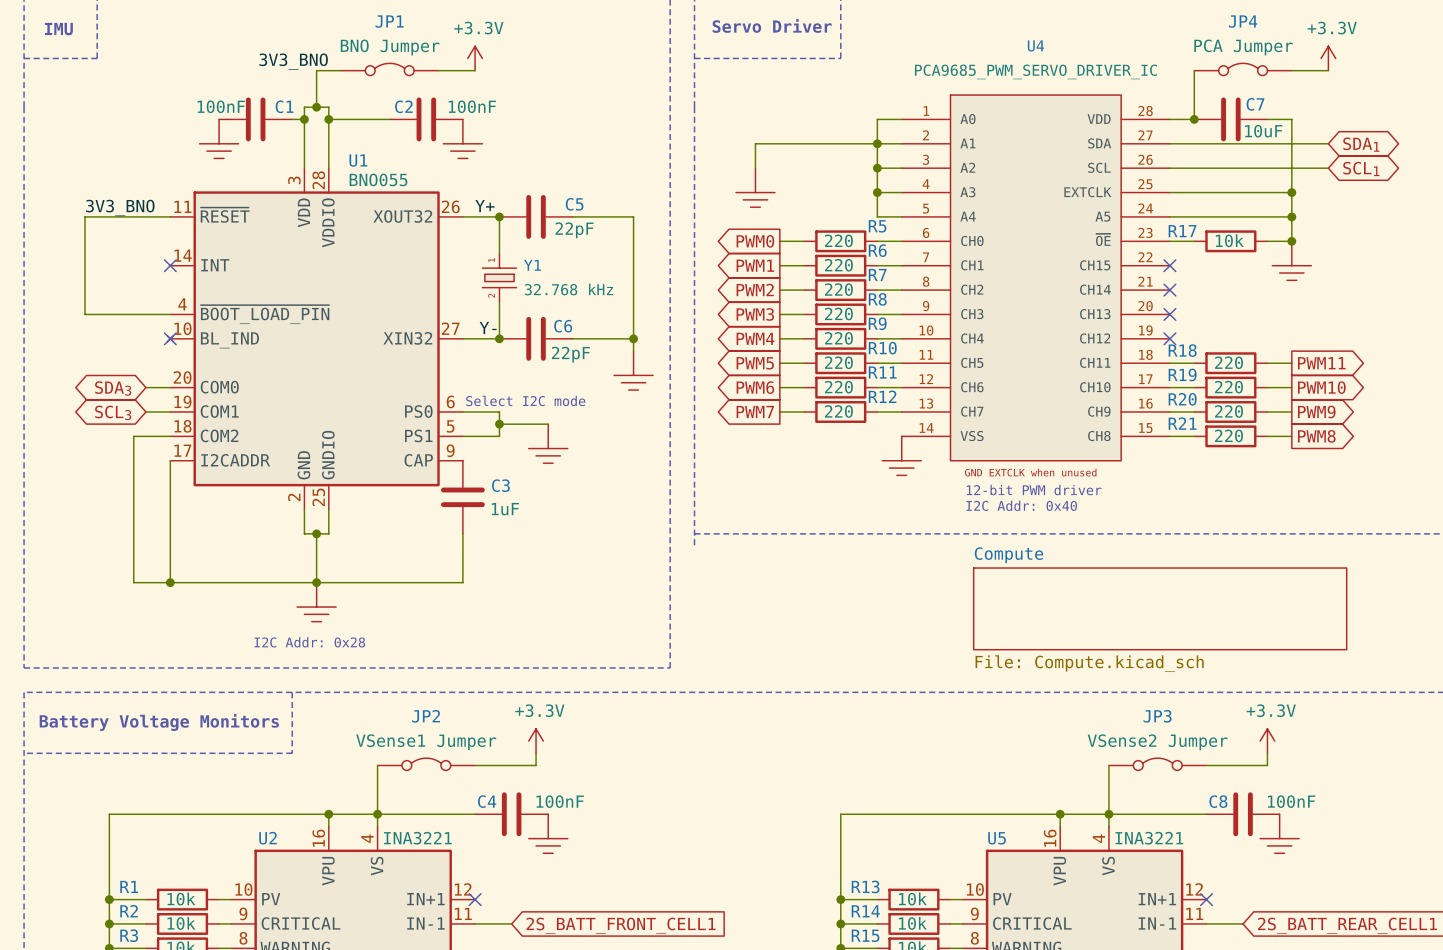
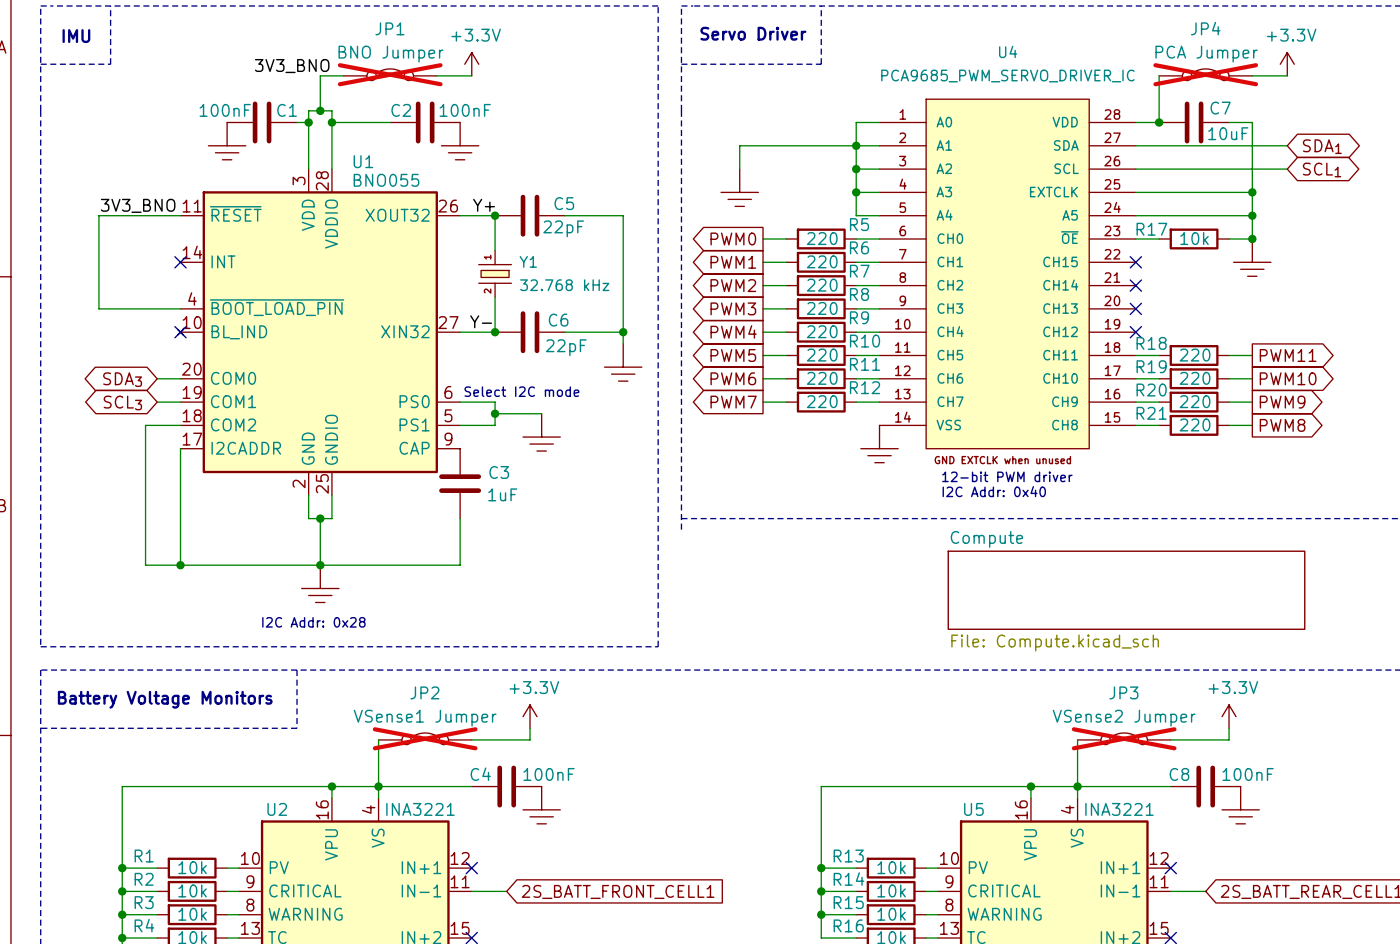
JP1 do-not-place cross: none -> (390, 74)
JP4 do-not-place cross: none -> (1205, 74)
JP2 do-not-place cross: none -> (425, 738)
JP3 do-not-place cross: none -> (1124, 738)

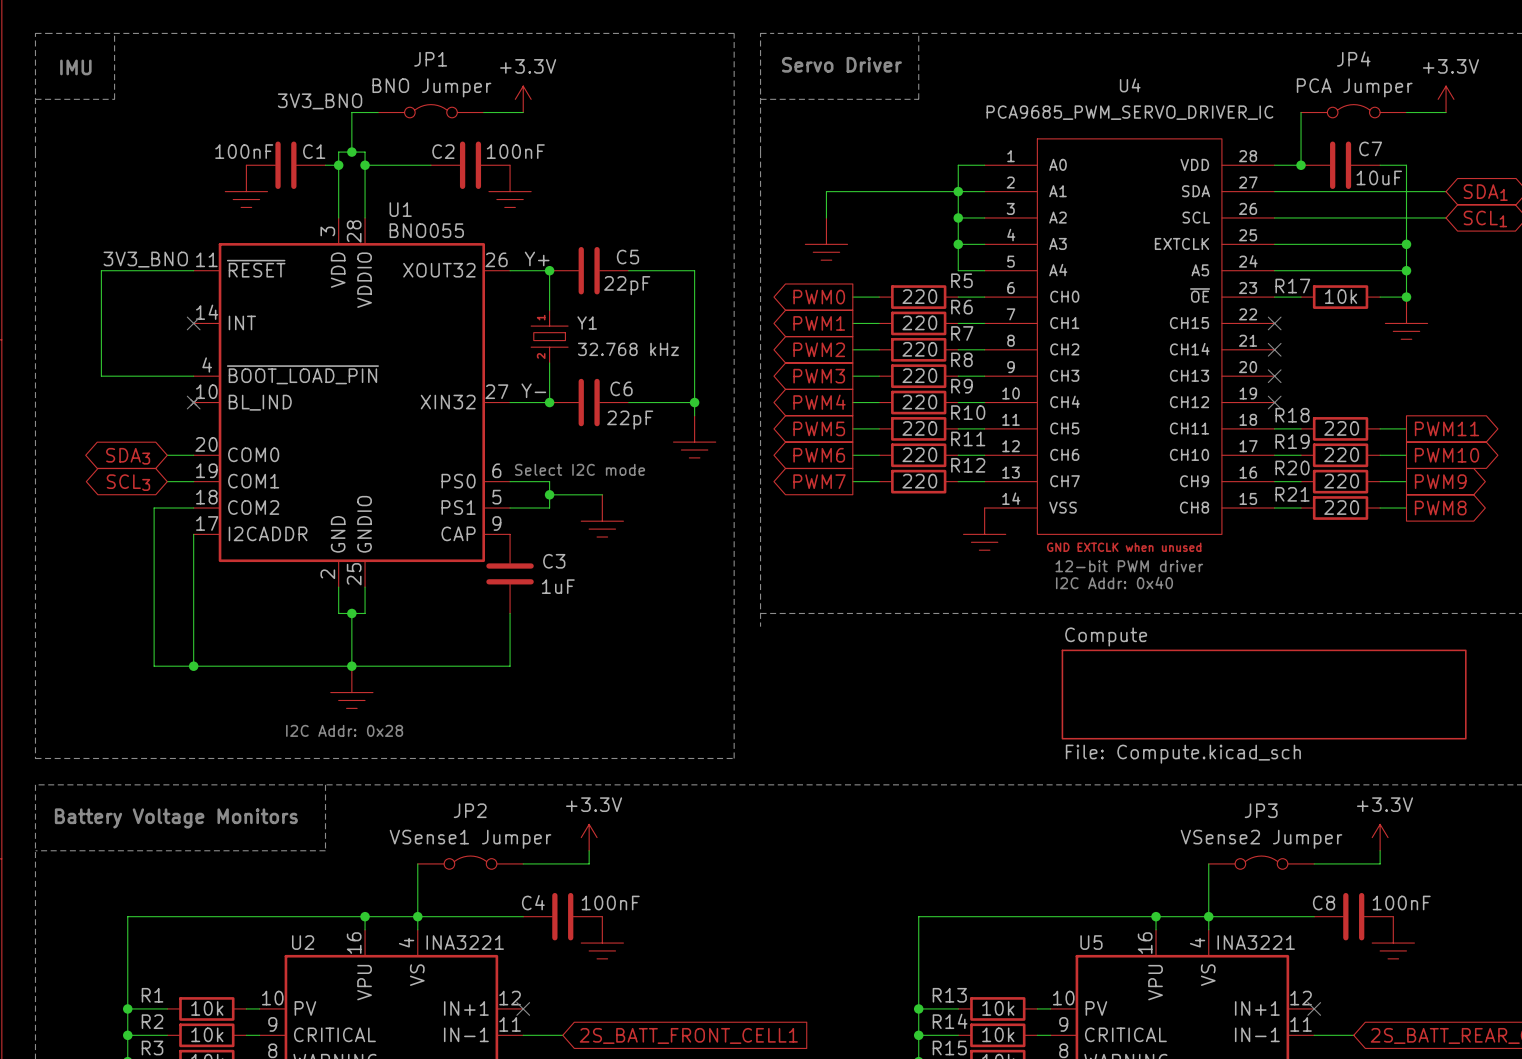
JP1 do-not-place cross: (390, 74) -> none
JP4 do-not-place cross: (1205, 74) -> none
JP2 do-not-place cross: (425, 738) -> none
JP3 do-not-place cross: (1124, 738) -> none

